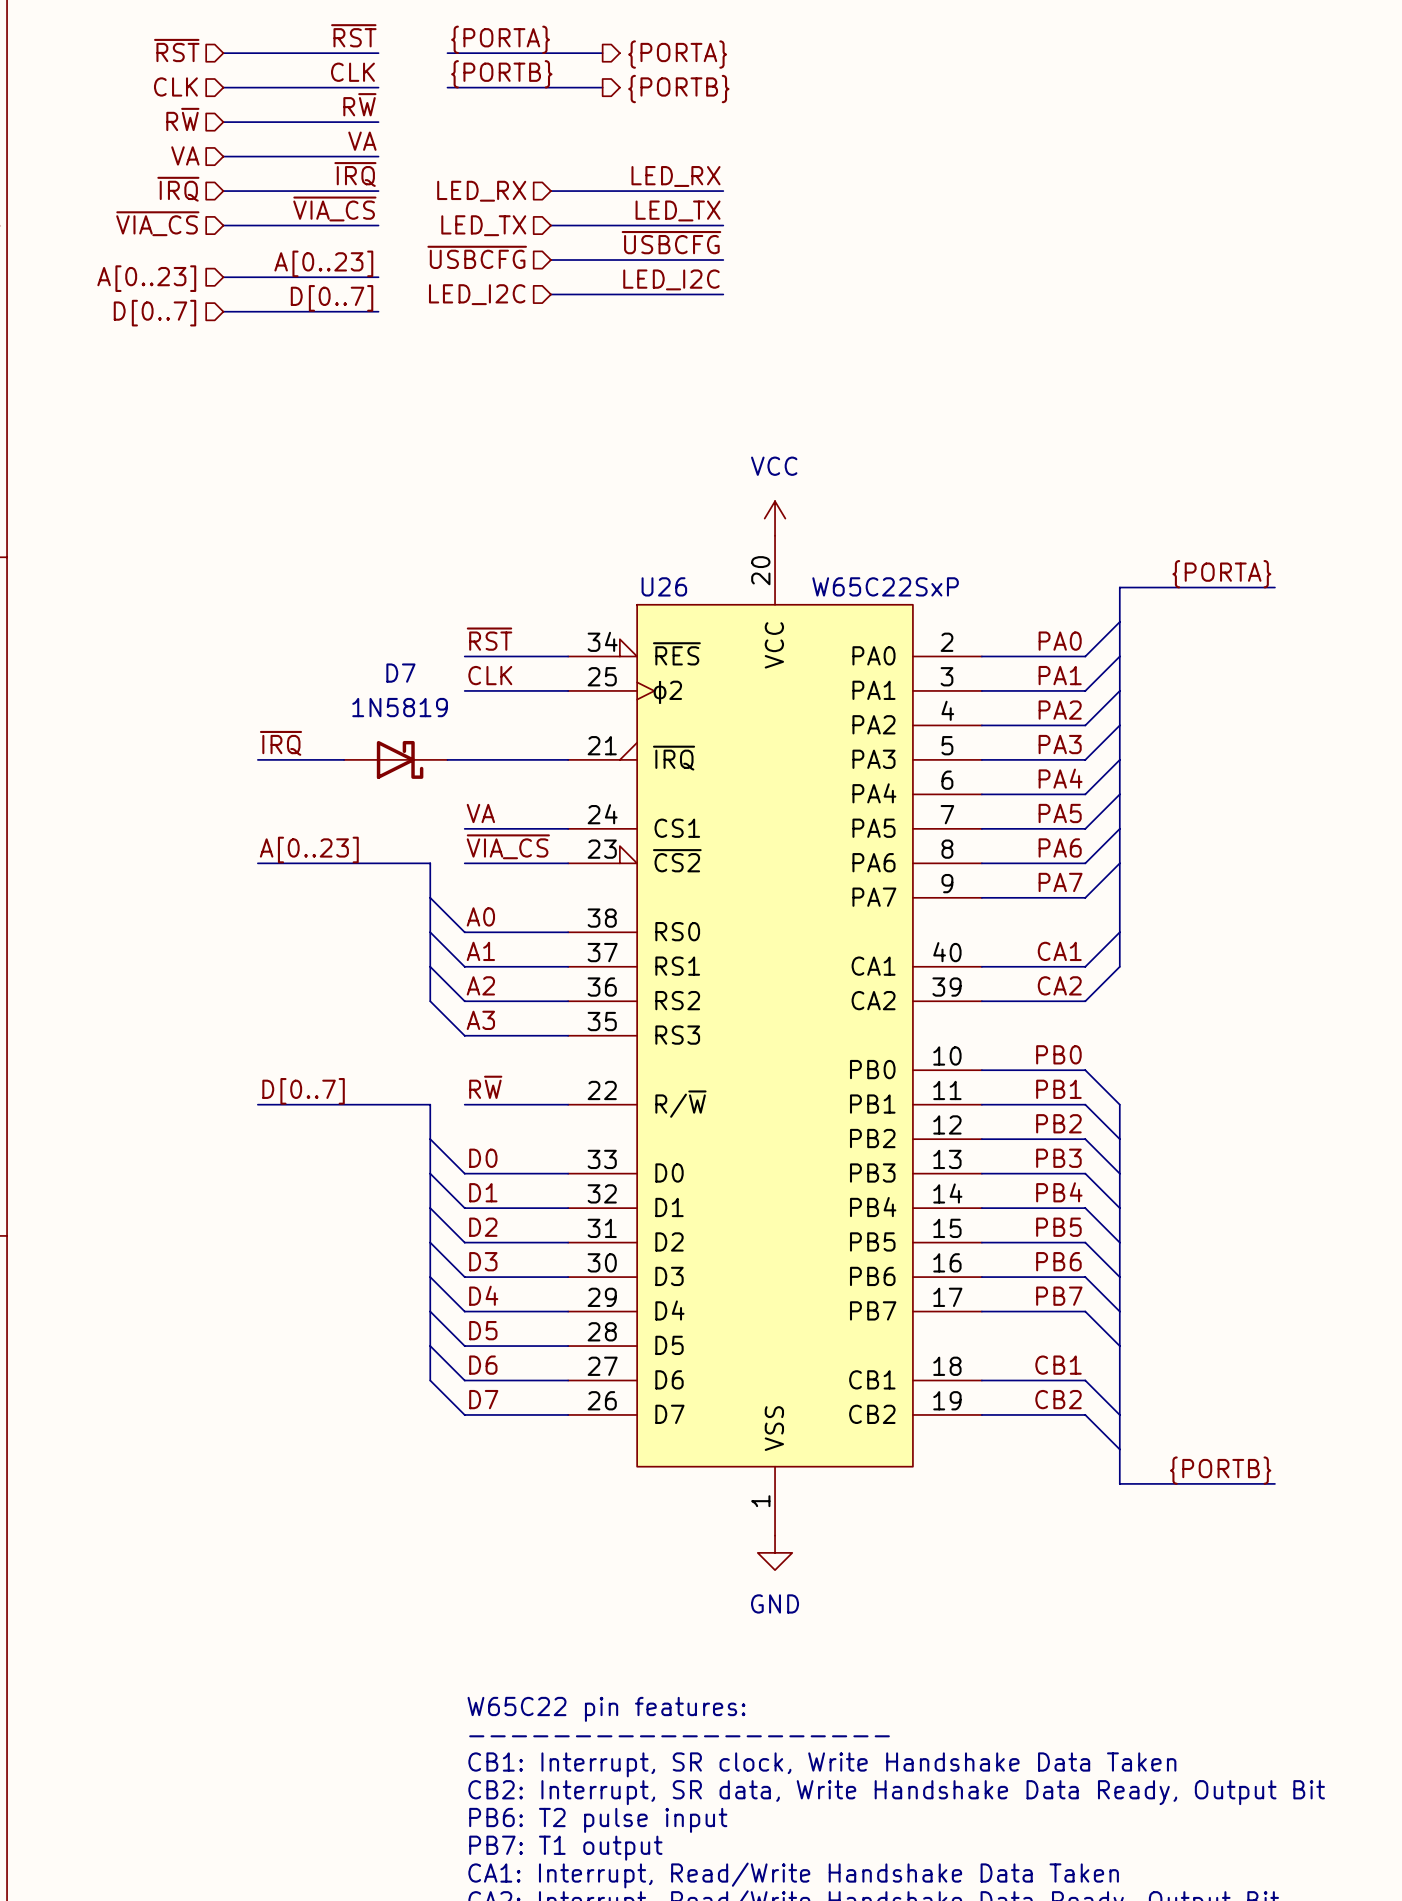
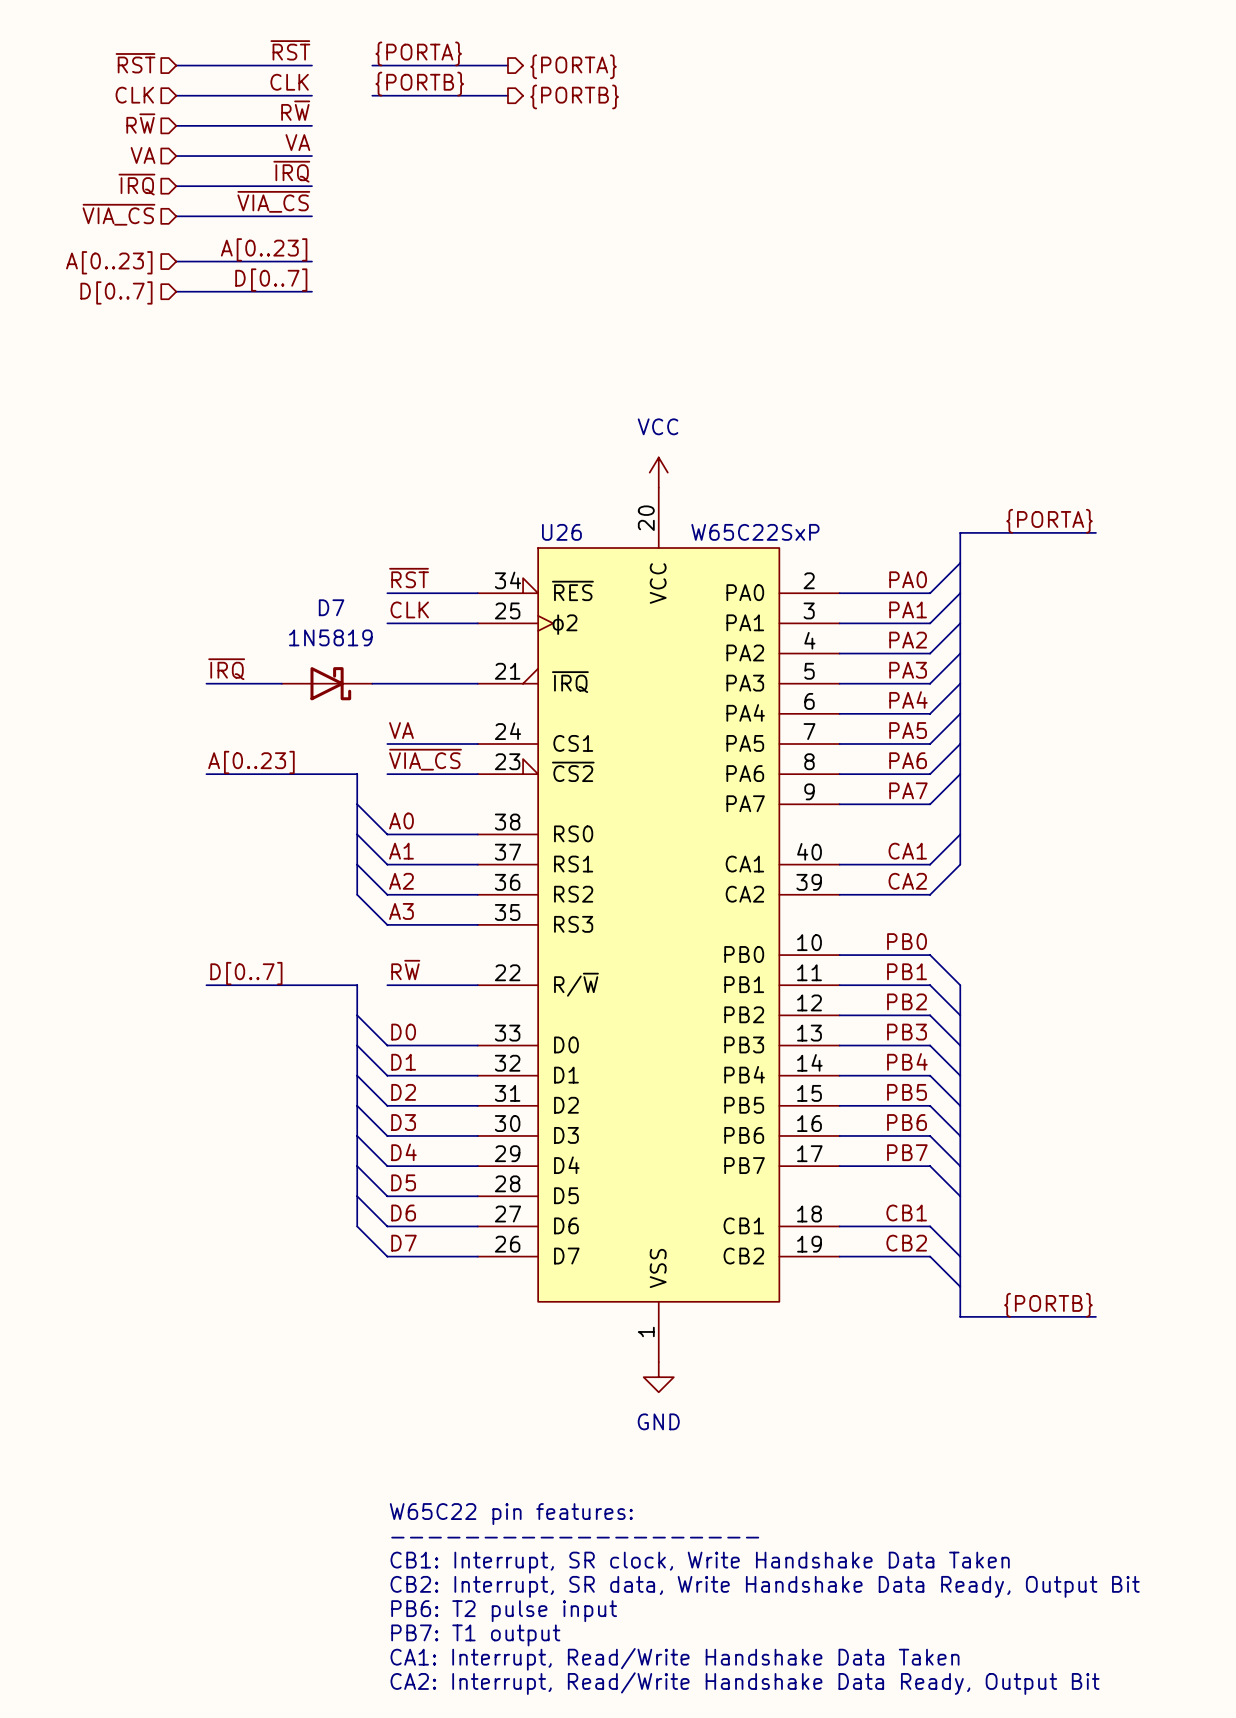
label: LED_RX (675, 176) -> none
hierarchical label: LED_RX (481, 191) -> none
wire: (550, 191) (723, 191) -> none
label: LED_TX (678, 210) -> none
hierarchical label: LED_TX (483, 225) -> none
wire: (550, 225) (723, 225) -> none
label: ~{USBCFG} (671, 242) -> none
hierarchical label: ~{USBCFG} (477, 257) -> none
wire: (550, 260) (723, 260) -> none
label: LED_I2C (671, 279) -> none
hierarchical label: LED_I2C (477, 294) -> none
wire: (550, 294) (723, 294) -> none

